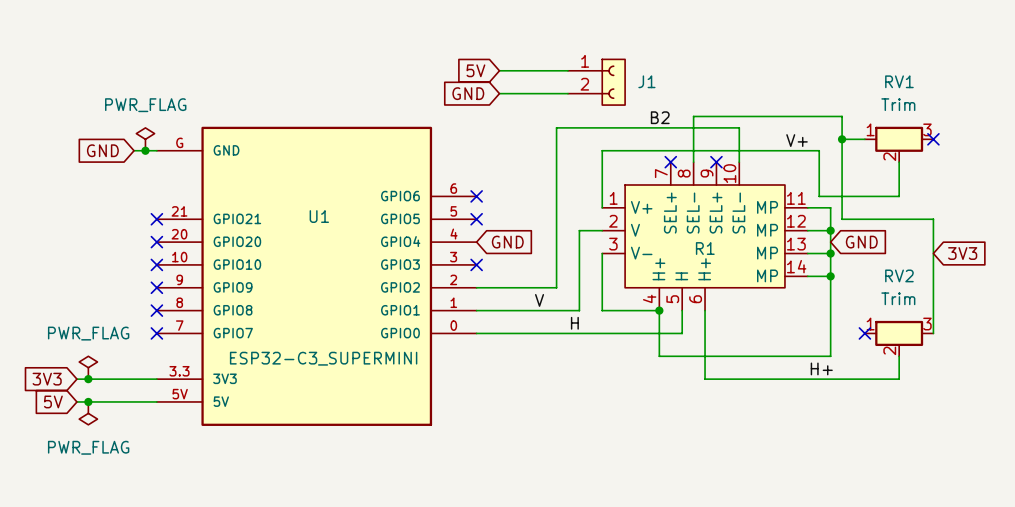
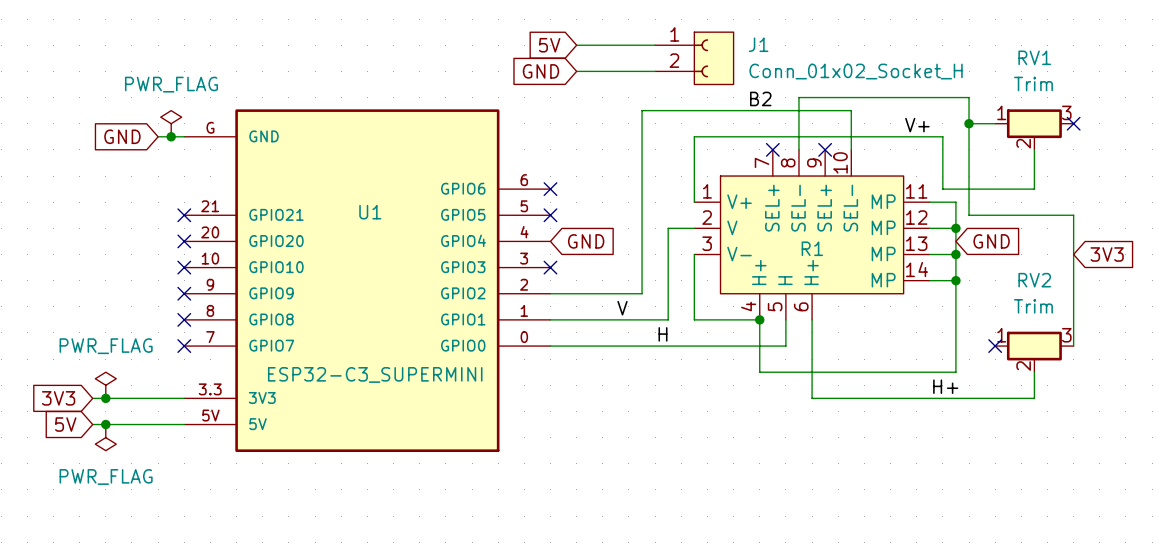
J1 symbol: [567, 59, 626, 106] -> [655, 32, 734, 85]
J1 value: none -> Conn_01x02_Socket_H (856, 71)

